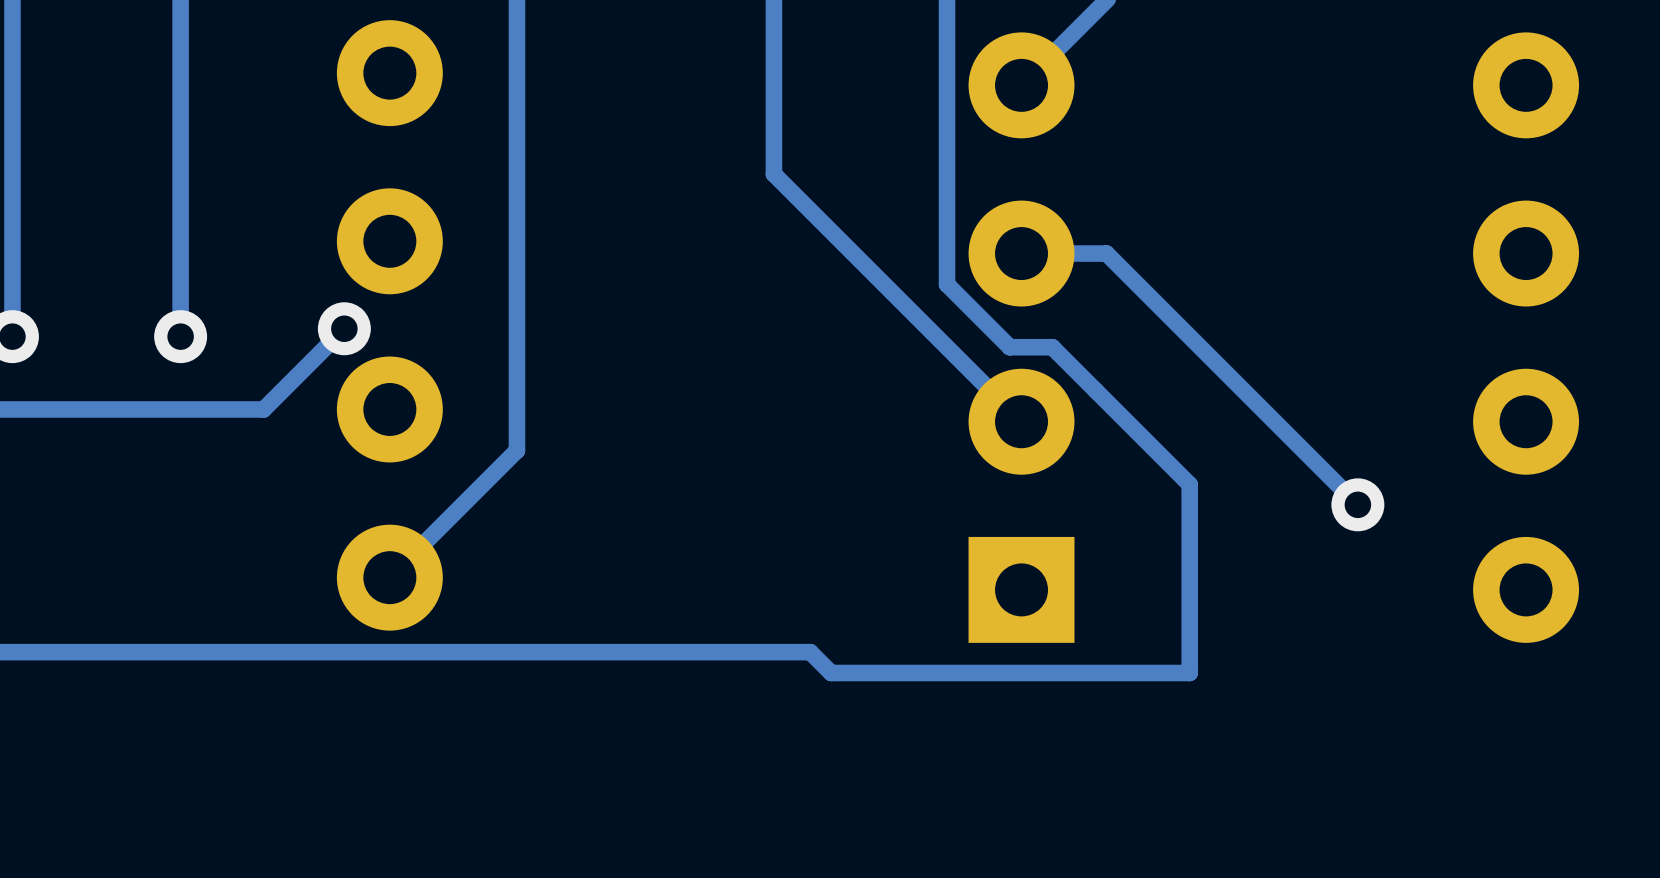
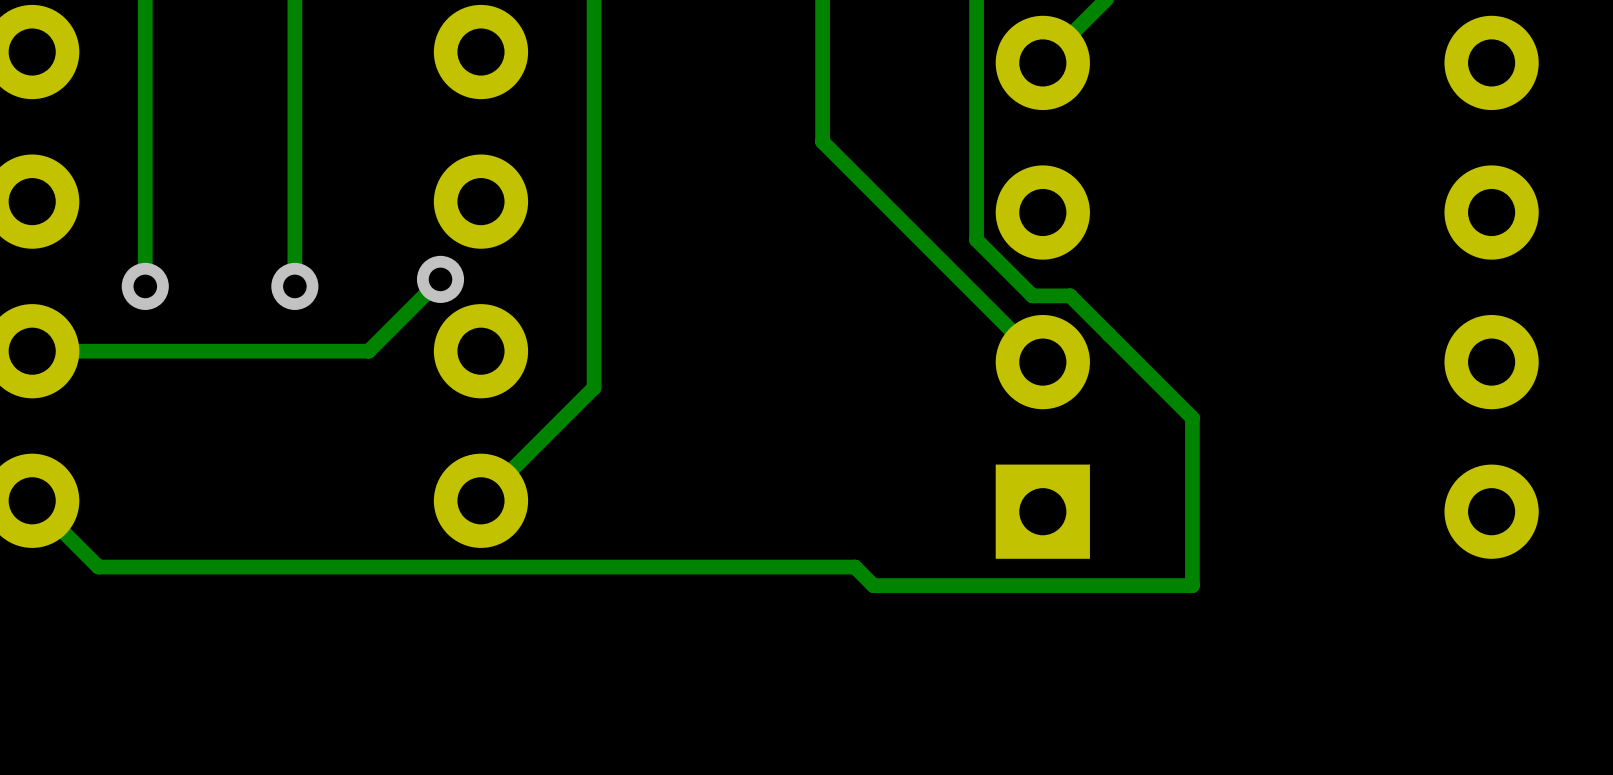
track: (1021, 253) (1106, 253) (1357, 504) -> none
via: (1357, 504) -> none

